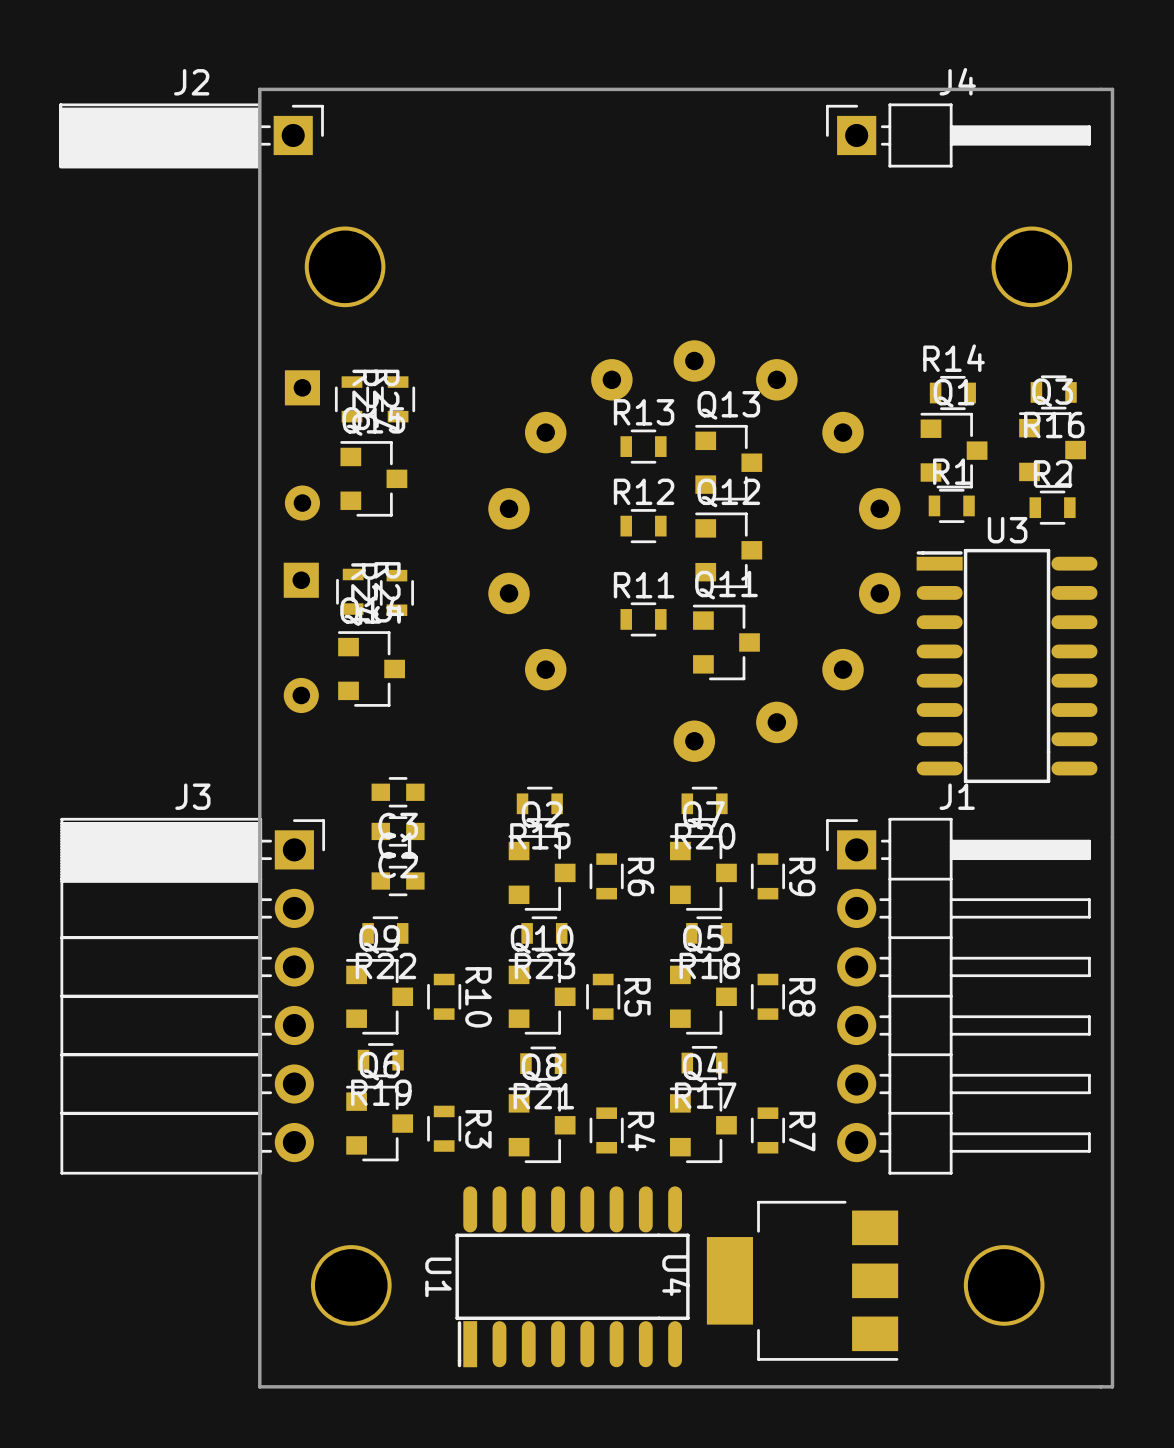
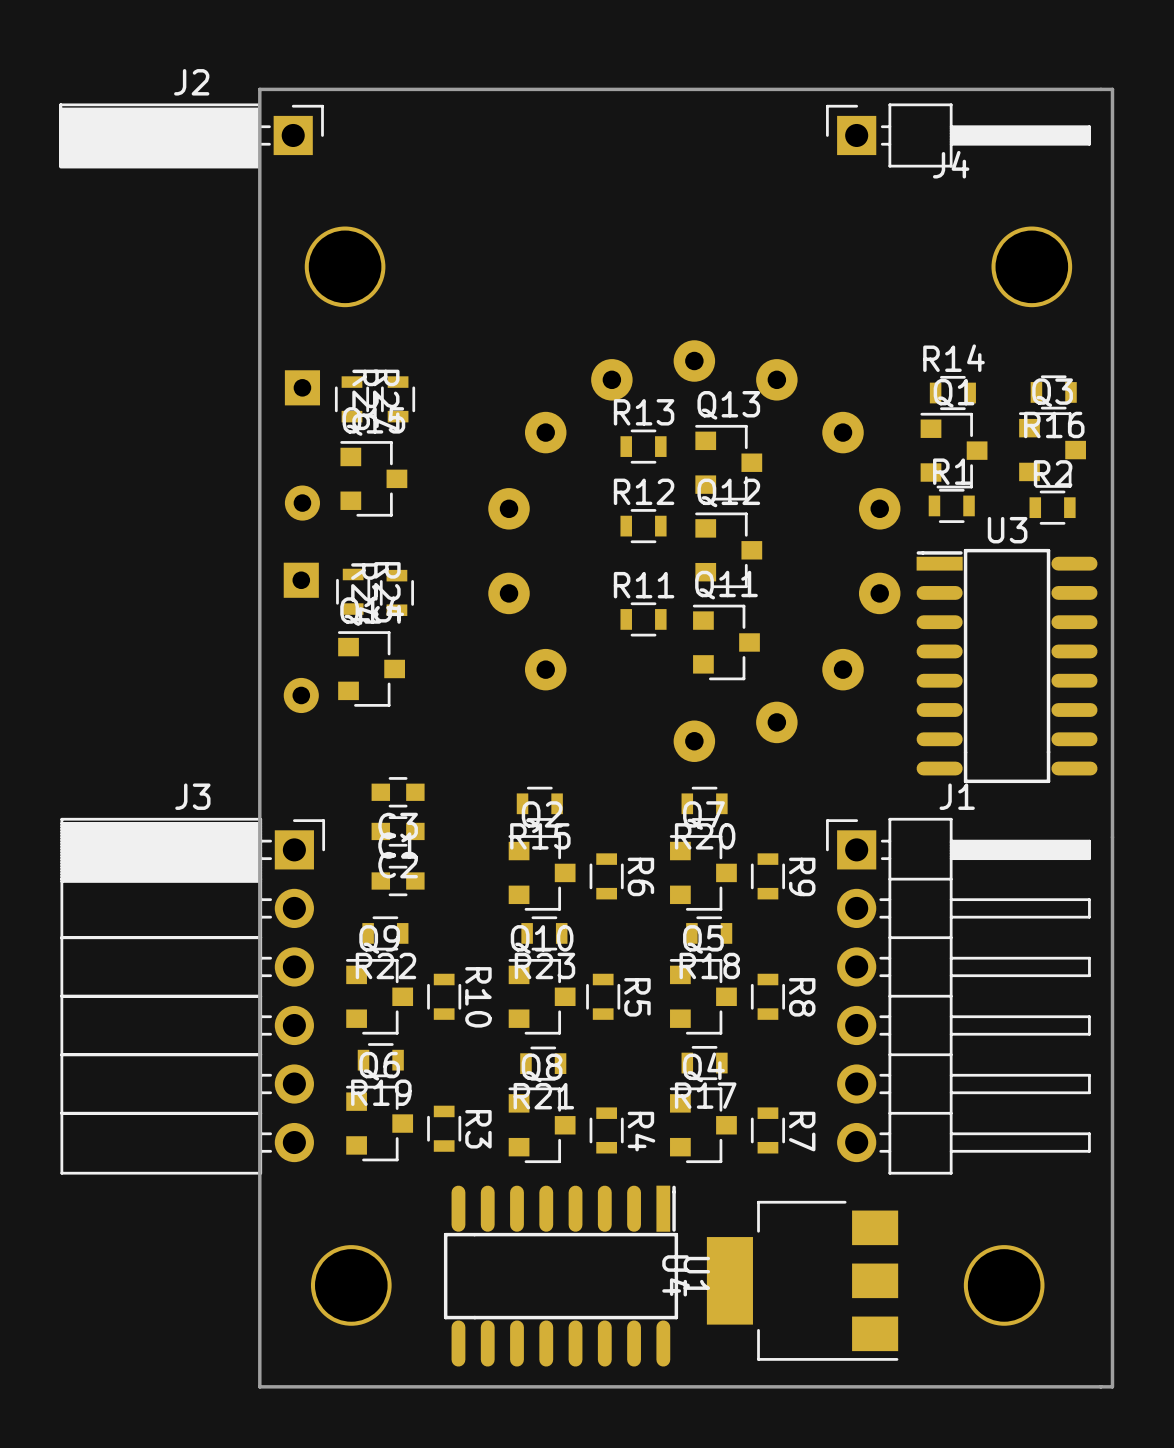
J4 name position: J4 (957, 81) -> J4 (951, 164)
U1 rotation: 0° (572, 1276) -> 180° (561, 1276)

